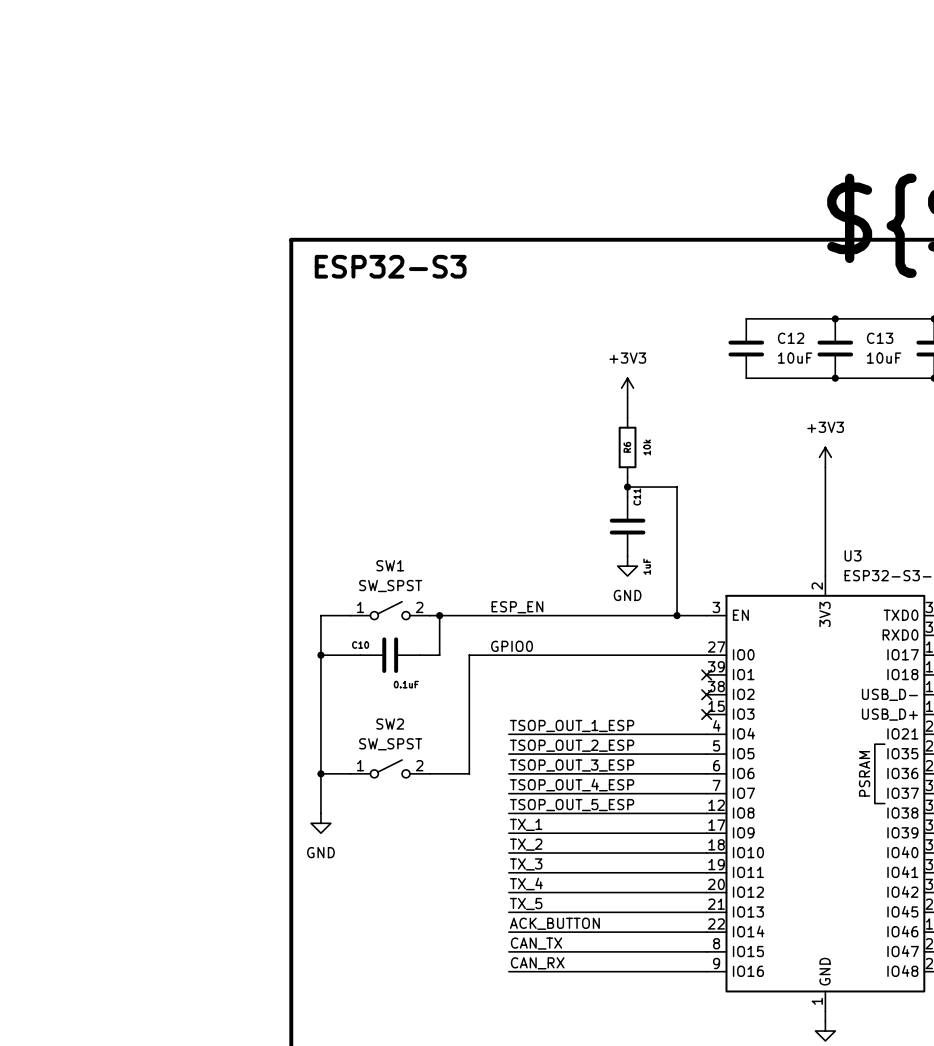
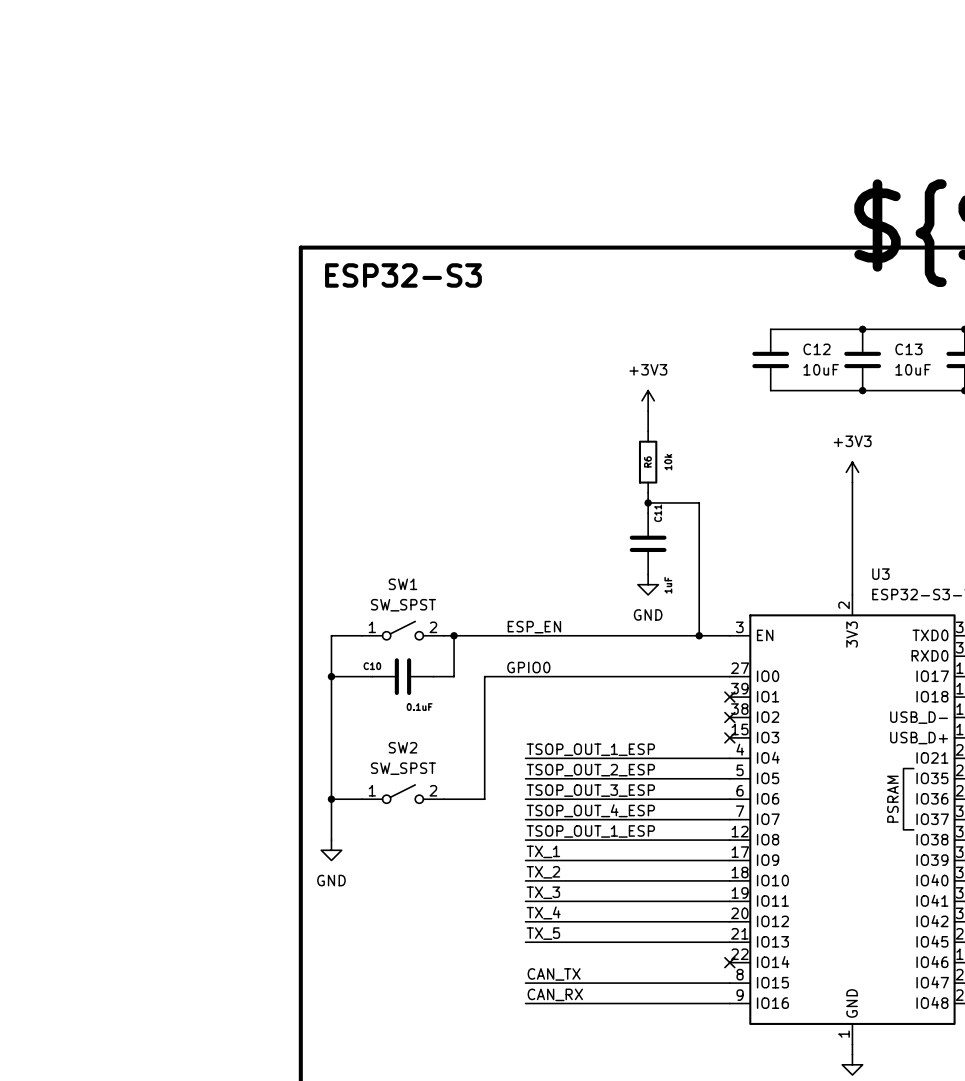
label: TSOP_OUT_5_ESP (572, 805) -> TSOP_OUT_1_ESP (590, 831)
label: ACK_BUTTON (554, 923) -> none
wire: (508, 932) (706, 932) -> none
no-connect mark: none -> (729, 962)

